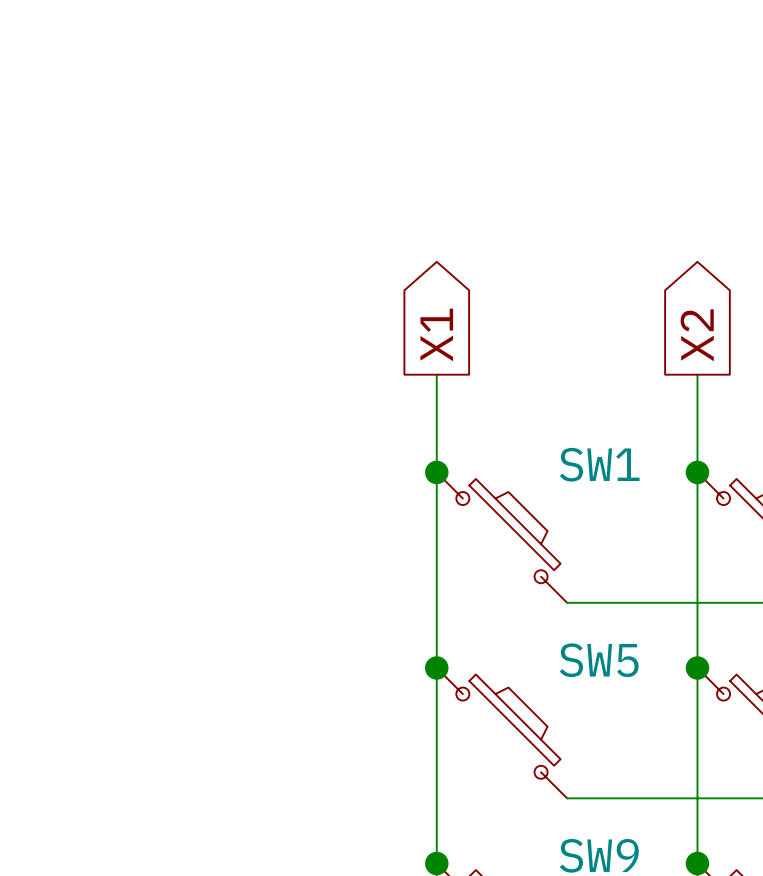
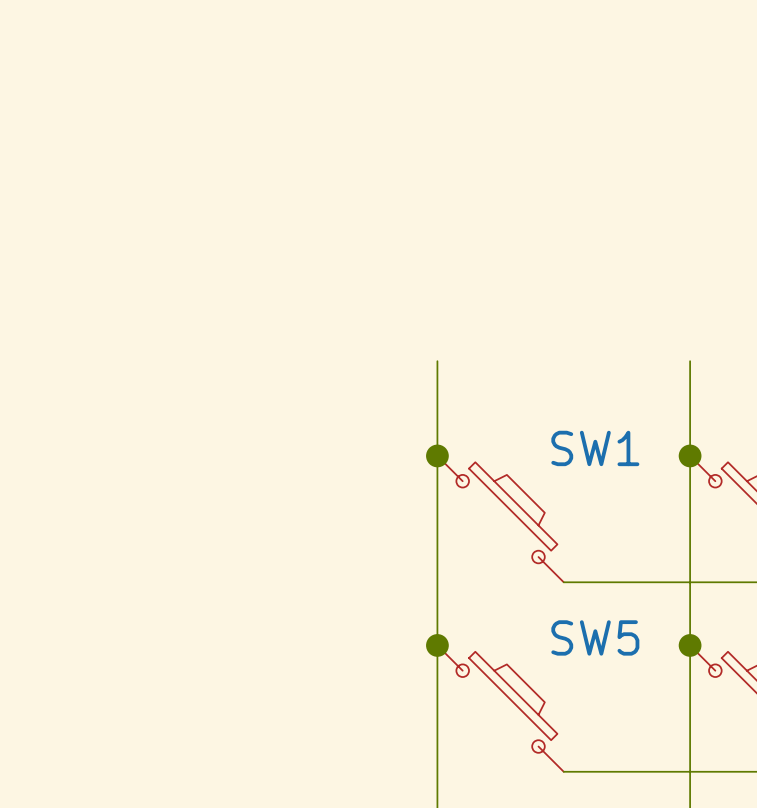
global label: X1 (436, 334) -> none
global label: X2 (697, 335) -> none

